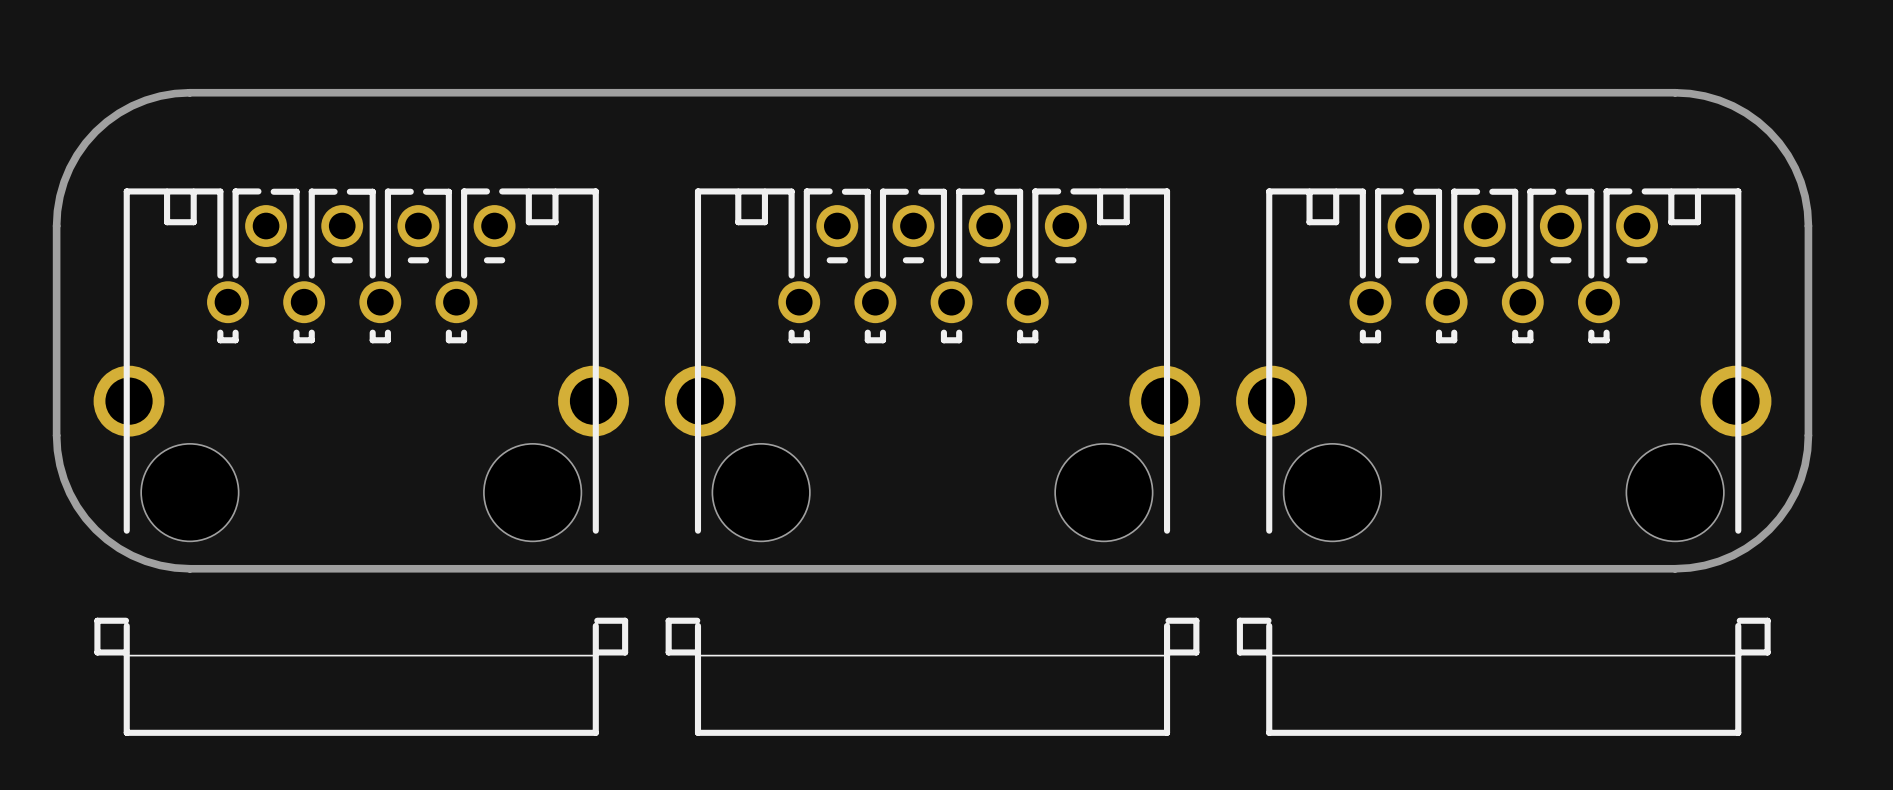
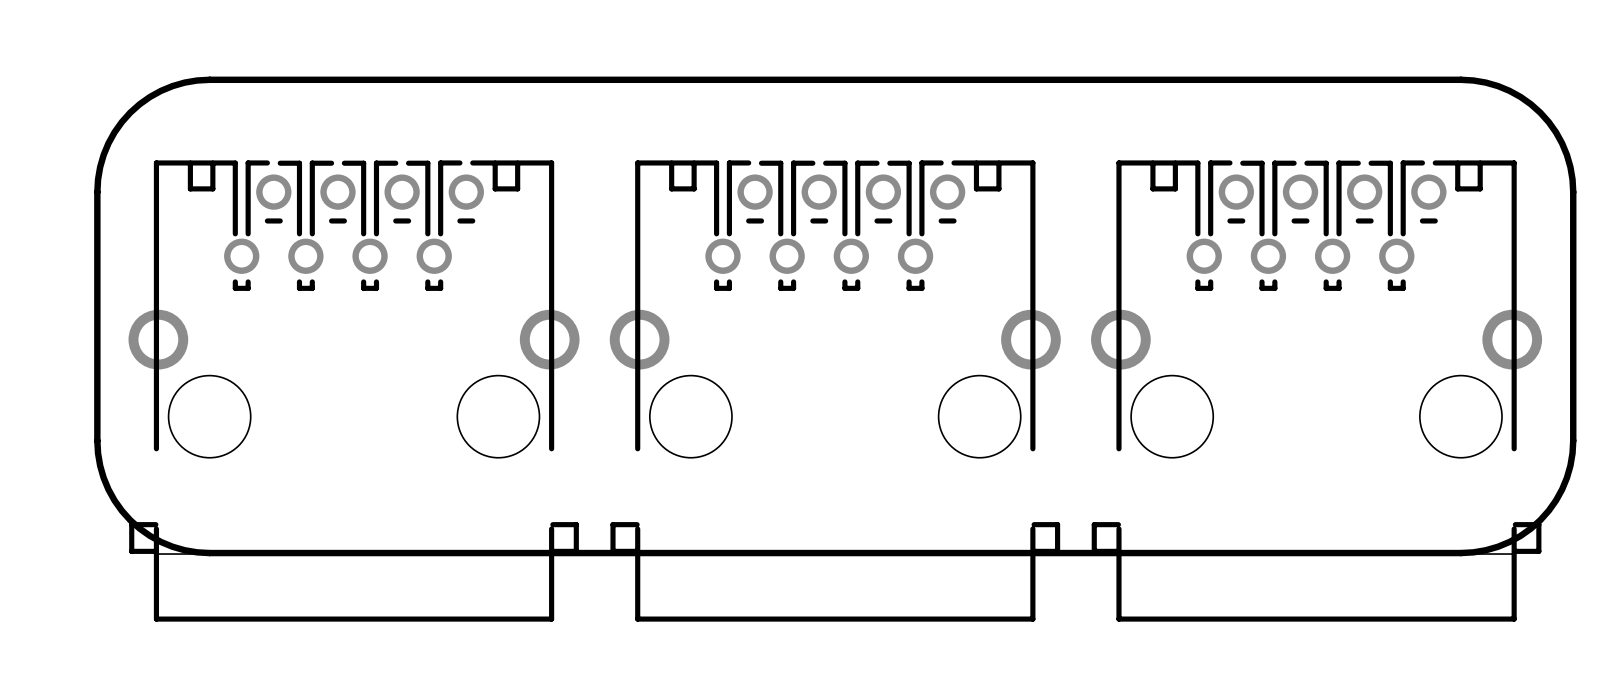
board edge: (56, 435) (57, 450) (64, 479) (77, 506) (95, 529) (118, 548) (145, 561) (174, 567) (189, 568) (1690, 567) (1719, 561) (1732, 555) (1746, 548) (1769, 529) (1787, 506) (1800, 479) (1807, 450) (1808, 435) -> (97, 368) (98, 453) (103, 477) (114, 500) (130, 520) (149, 535) (184, 550) (209, 553) (1473, 552) (1498, 546) (1520, 535) (1540, 520) (1562, 489) (1572, 453) (1573, 368)

